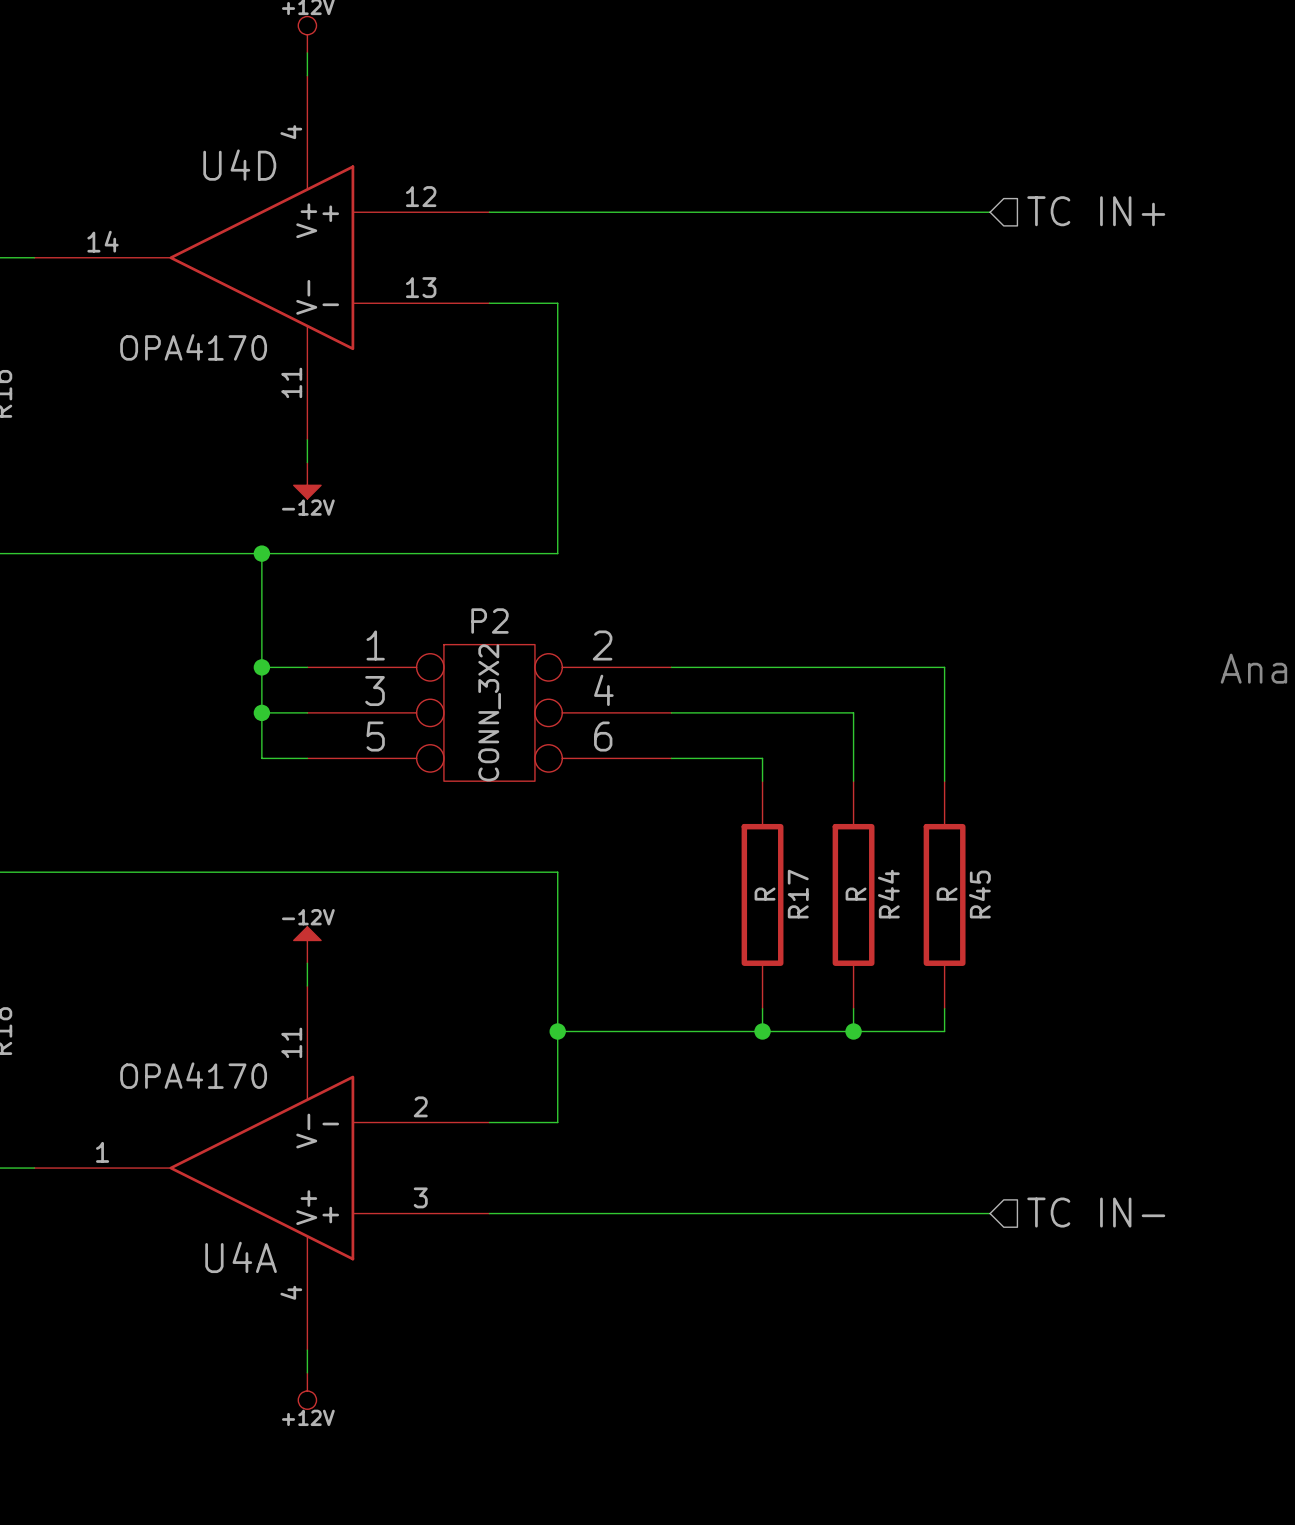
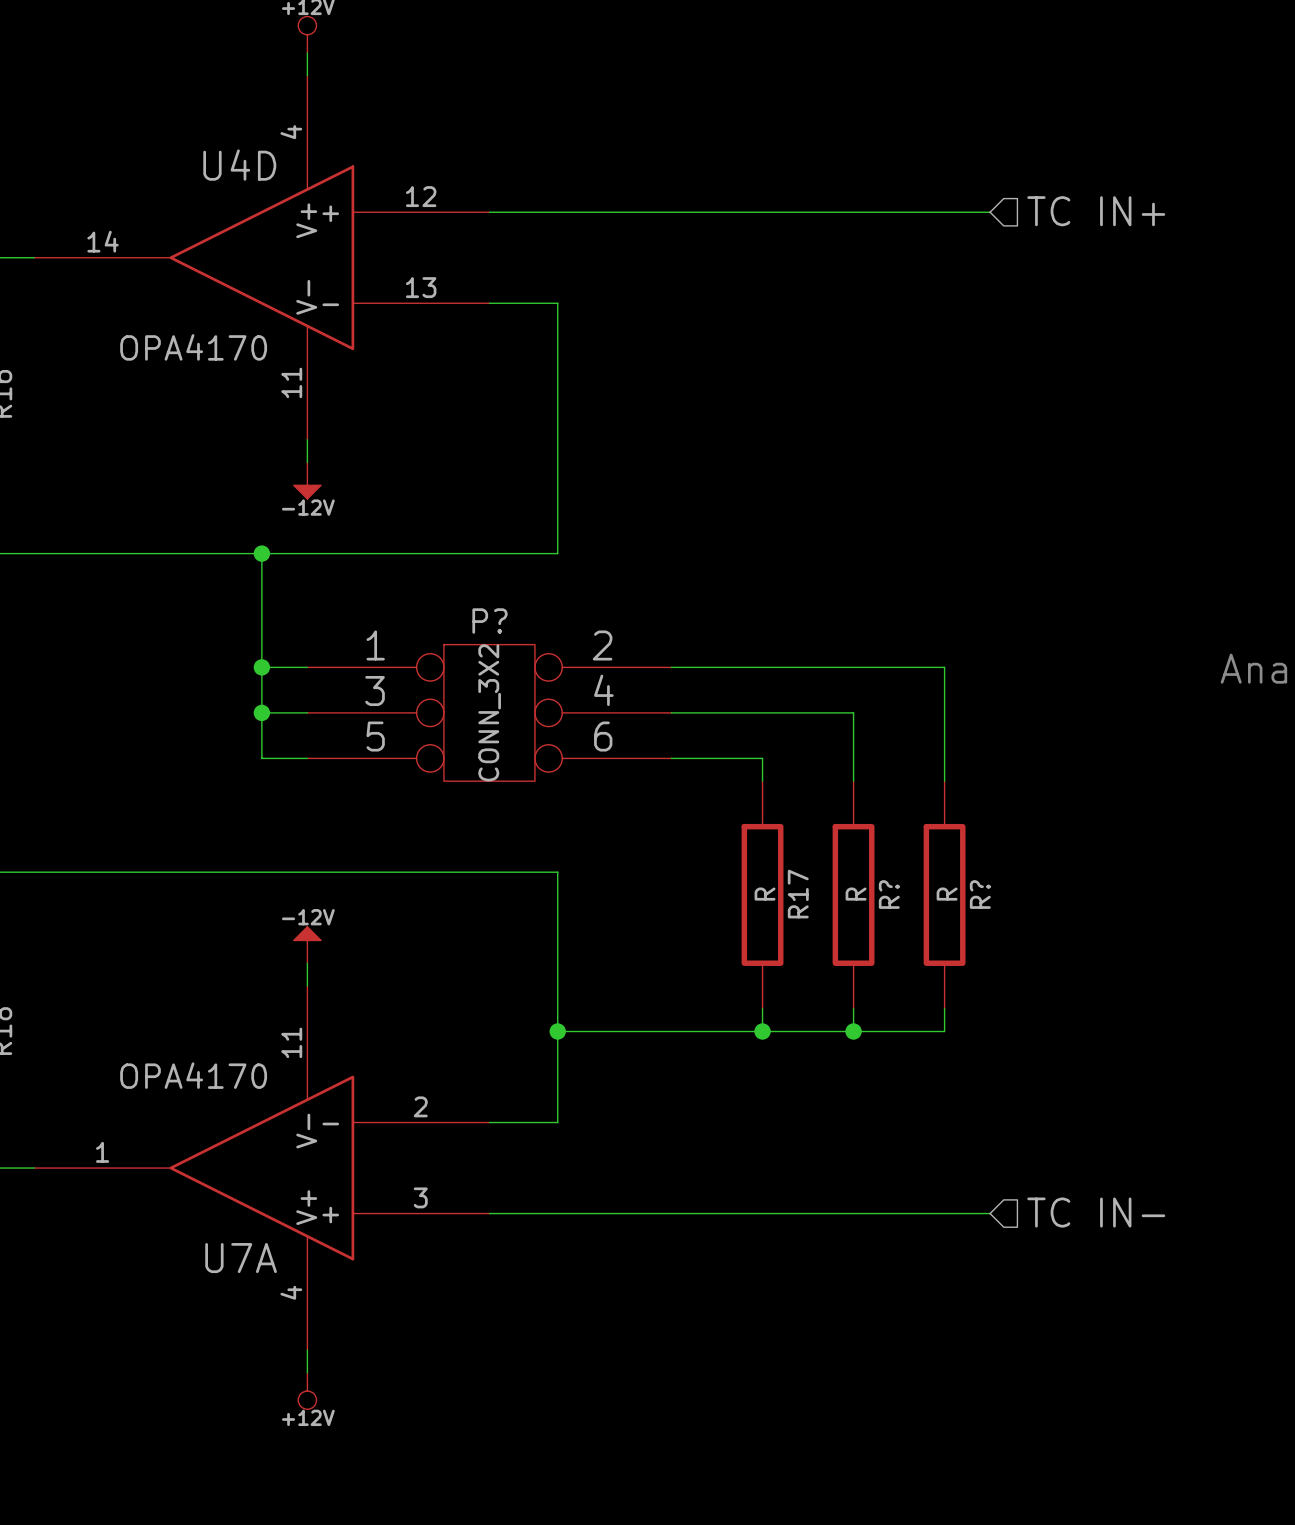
P2 name: P2 (489, 621) -> P? (489, 621)
R44 name: R44 (888, 894) -> R? (889, 894)
R45 name: R45 (979, 894) -> R? (980, 894)
U4A name: U4A (241, 1257) -> U7A (241, 1258)

